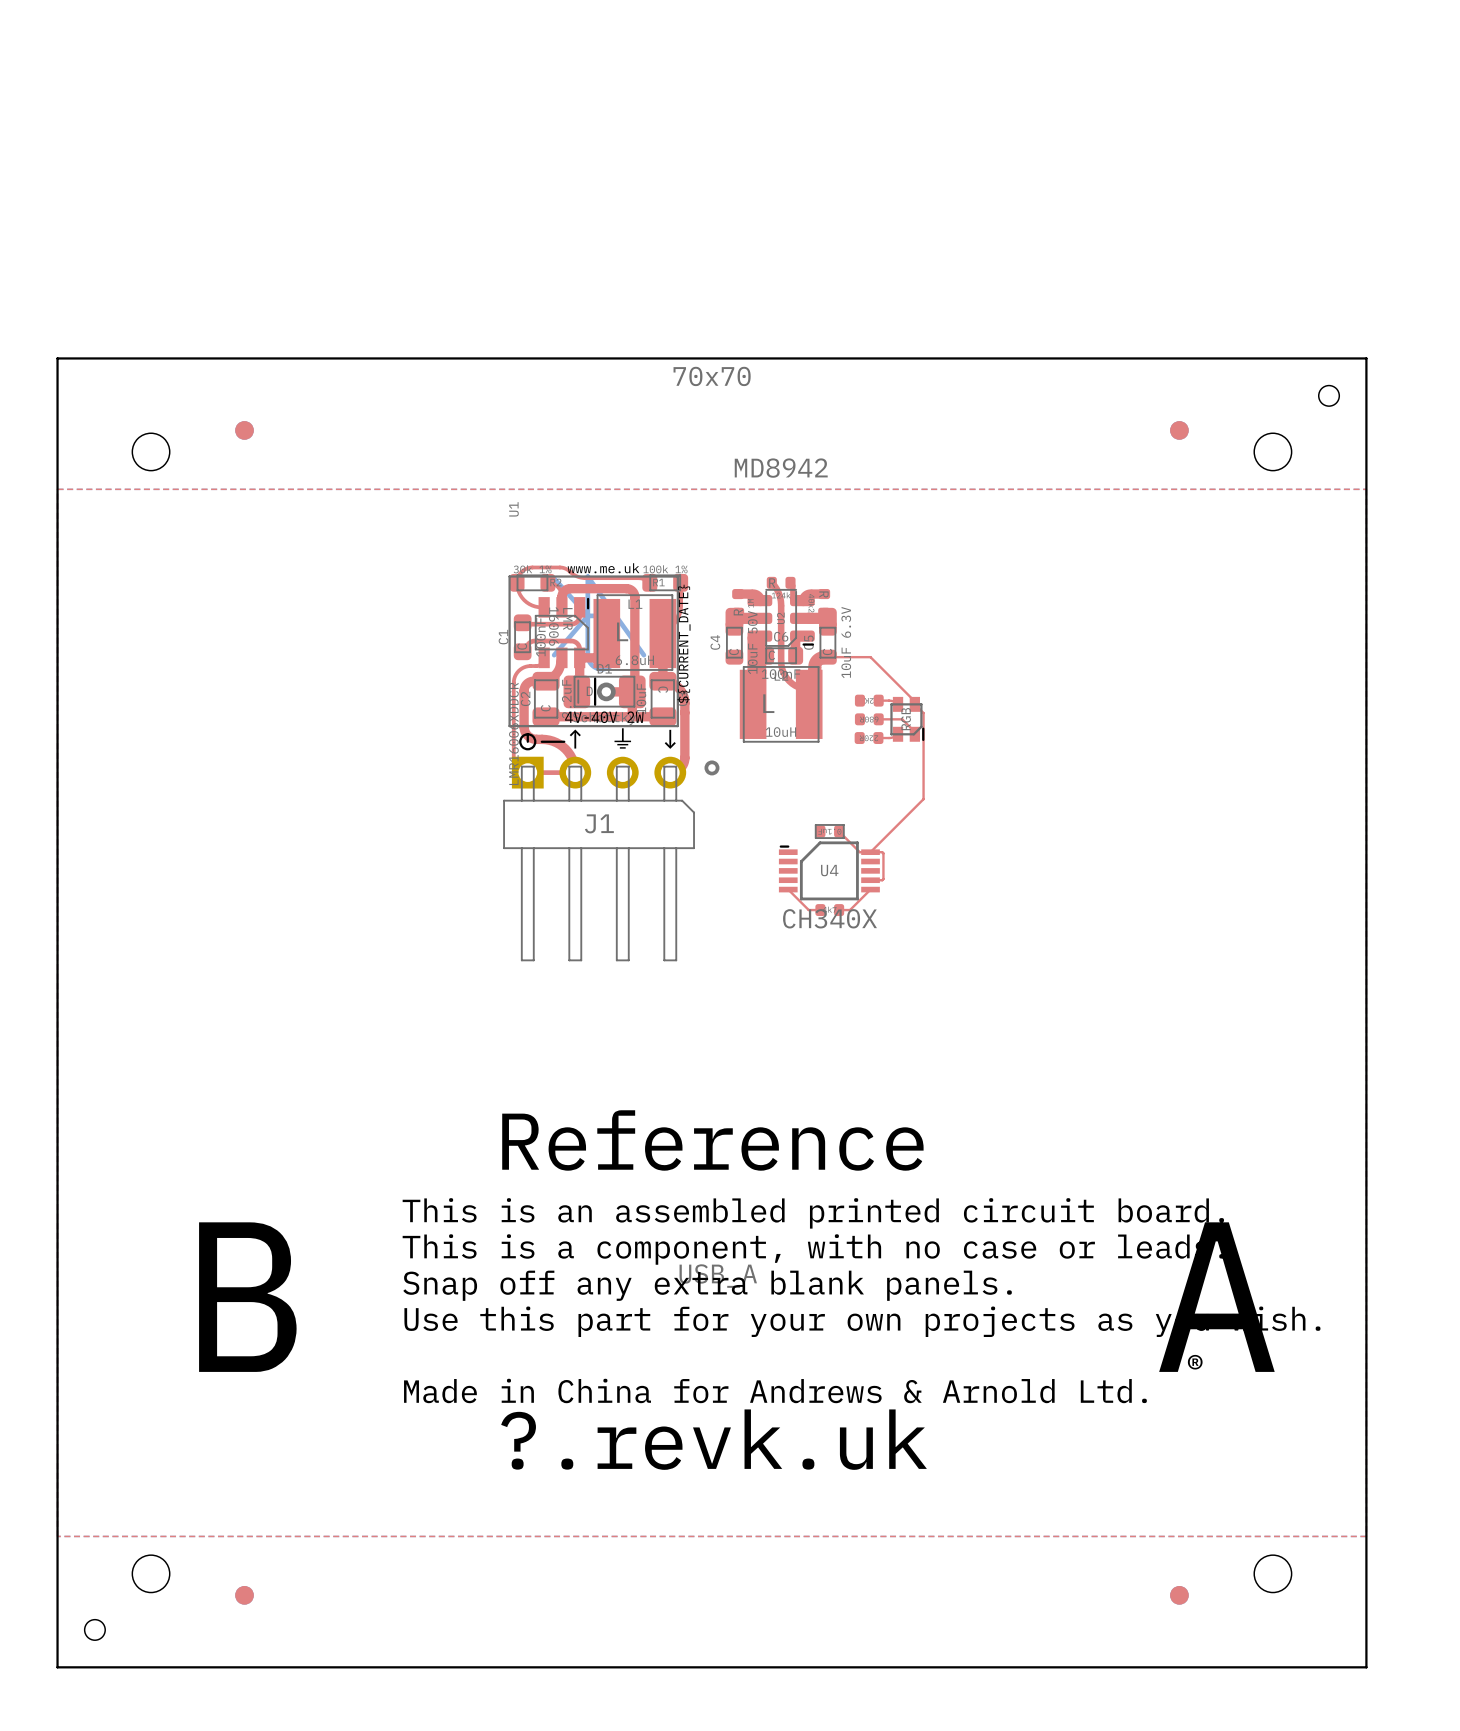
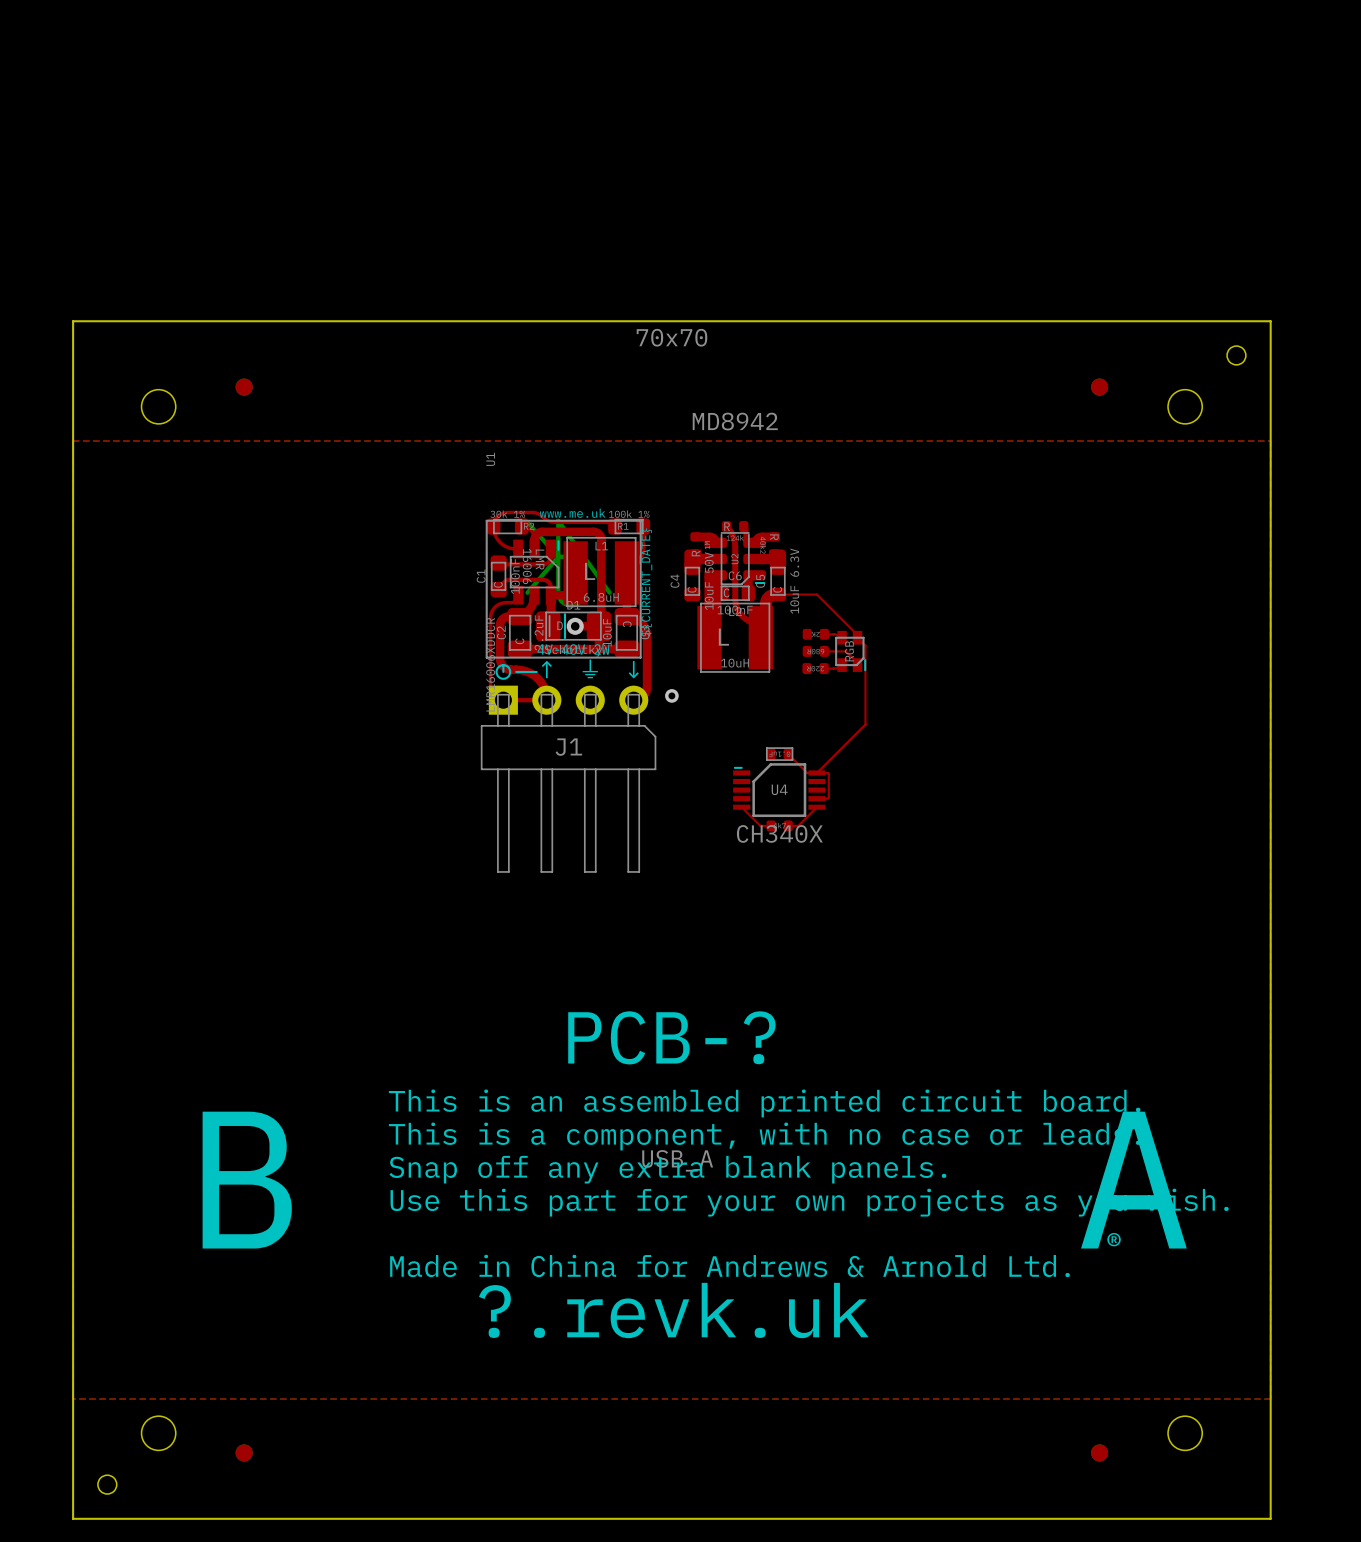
text: Reference (712, 1140) -> PCB-? (671, 1037)

